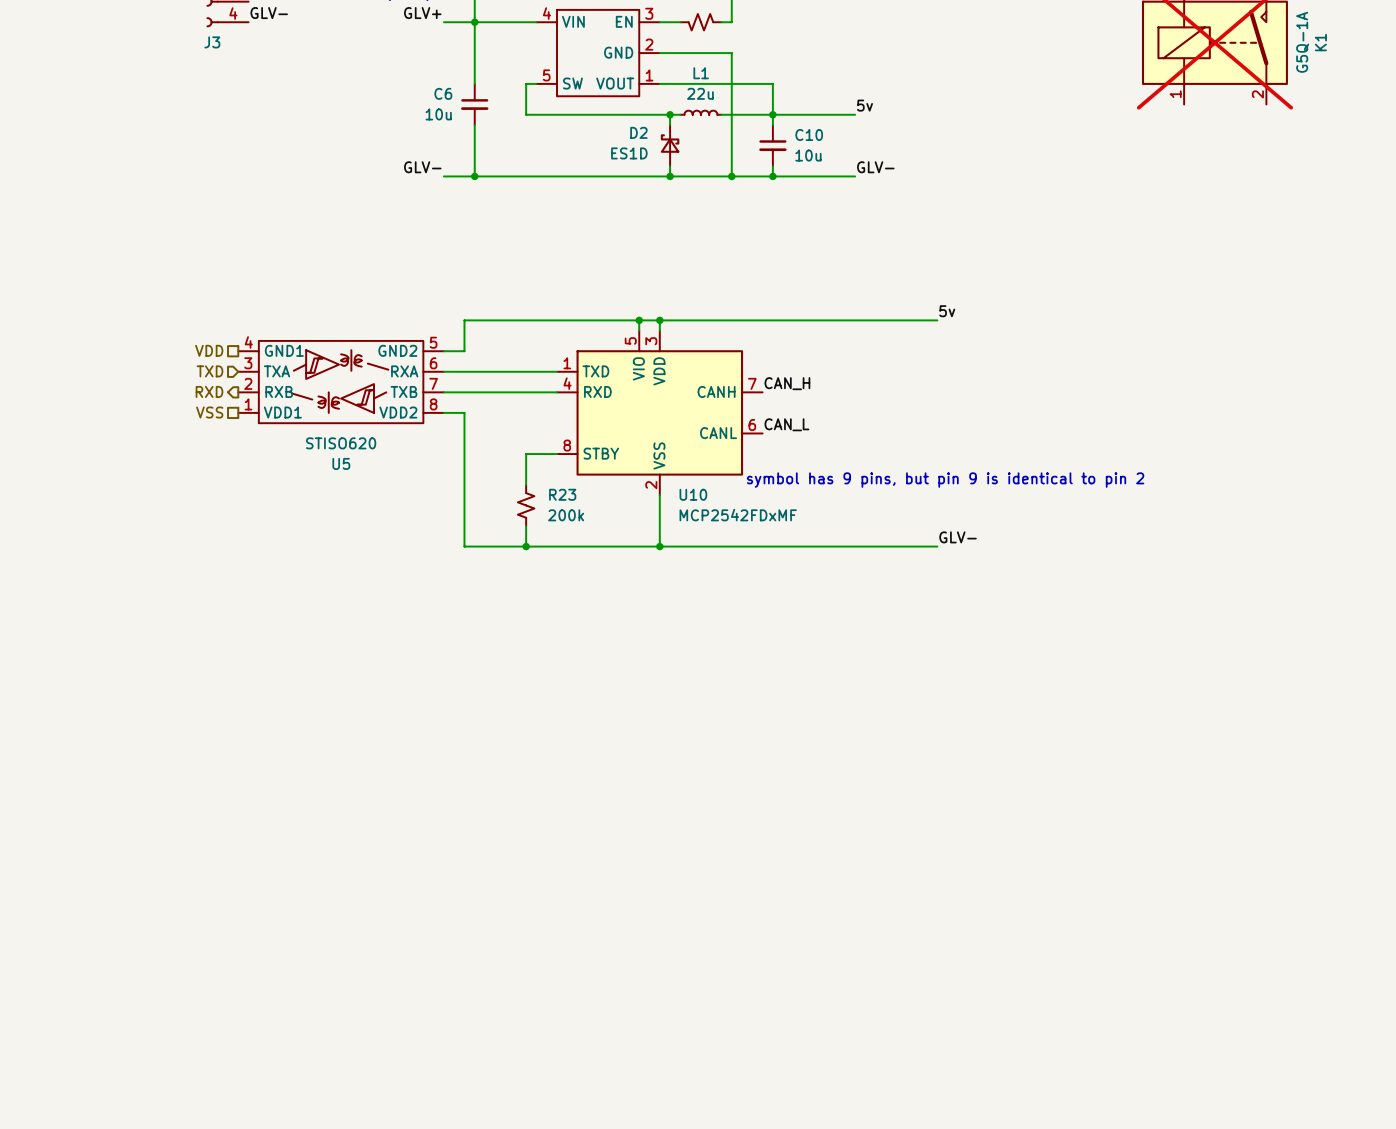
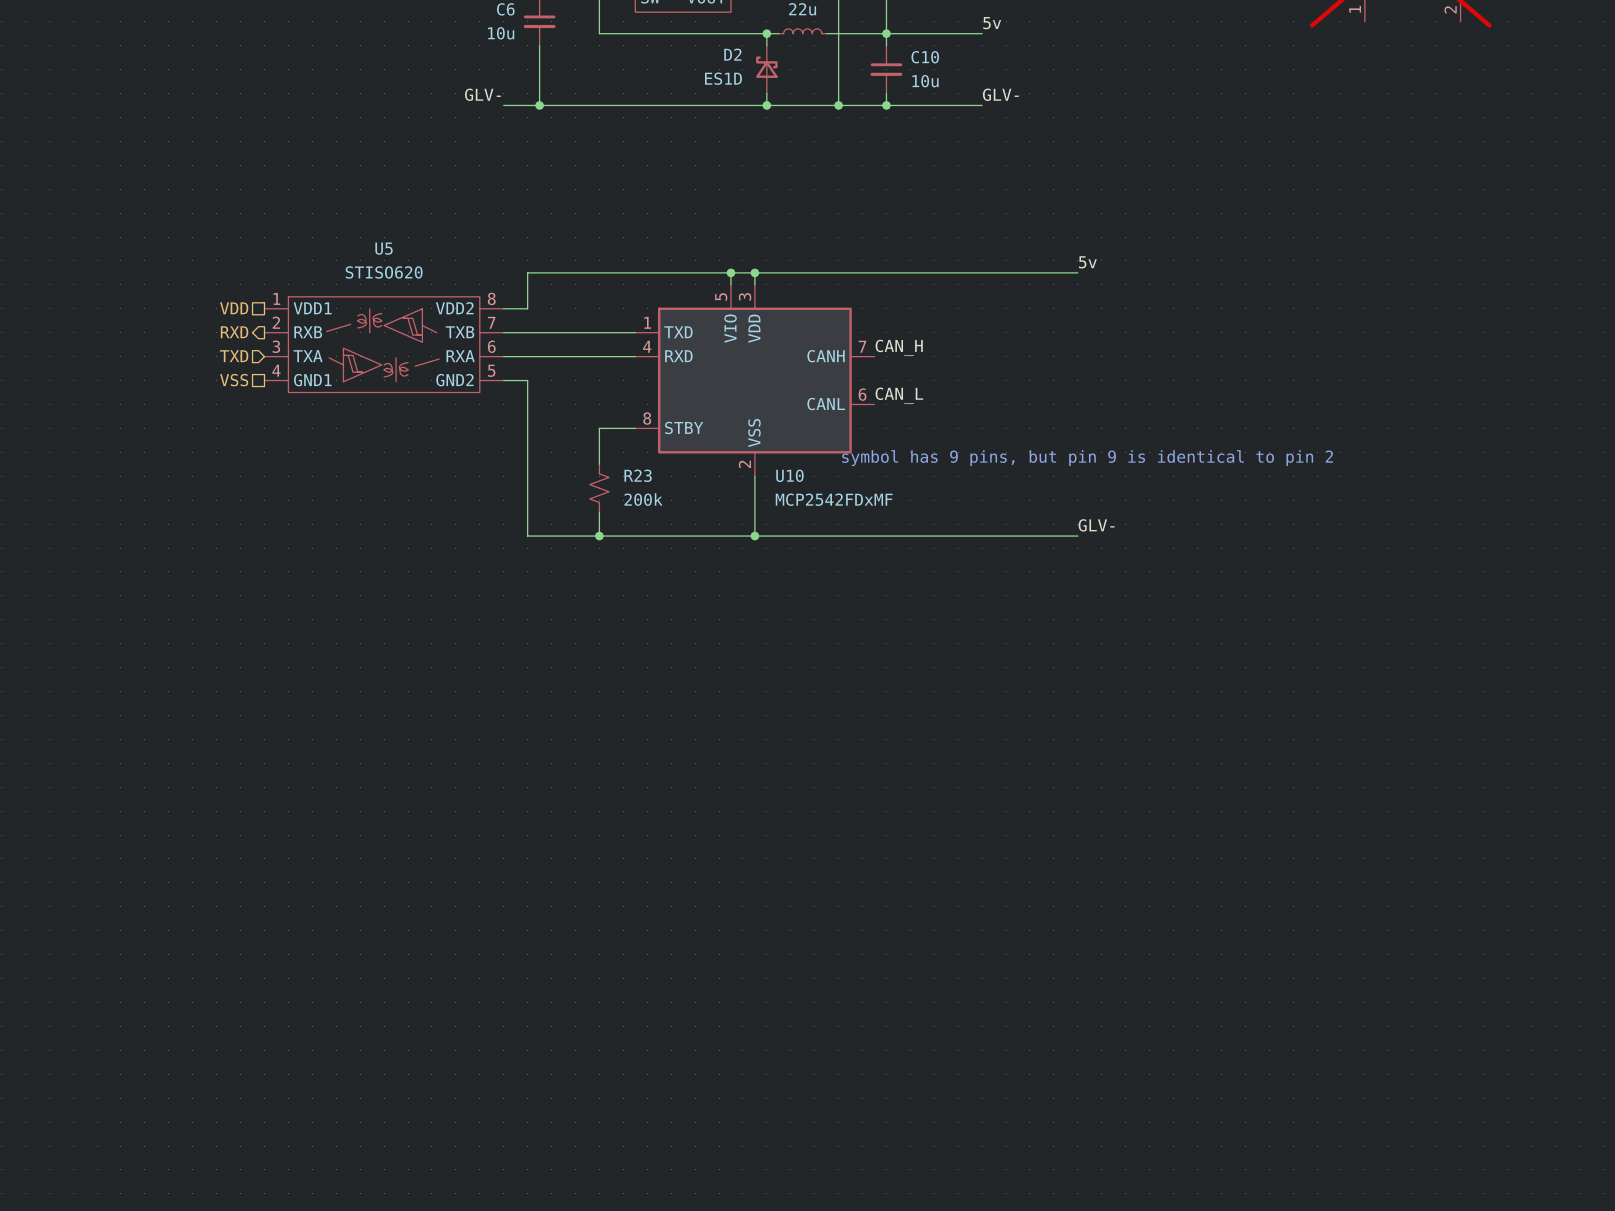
hierarchical label shape: input (209, 371) -> output (234, 332)
hierarchical label: TXD (209, 371) -> RXD (234, 332)
U5 flip: as is (341, 382) -> up-down (384, 344)
hierarchical label shape: output (209, 391) -> input (234, 356)
hierarchical label: RXD (209, 391) -> TXD (234, 356)

